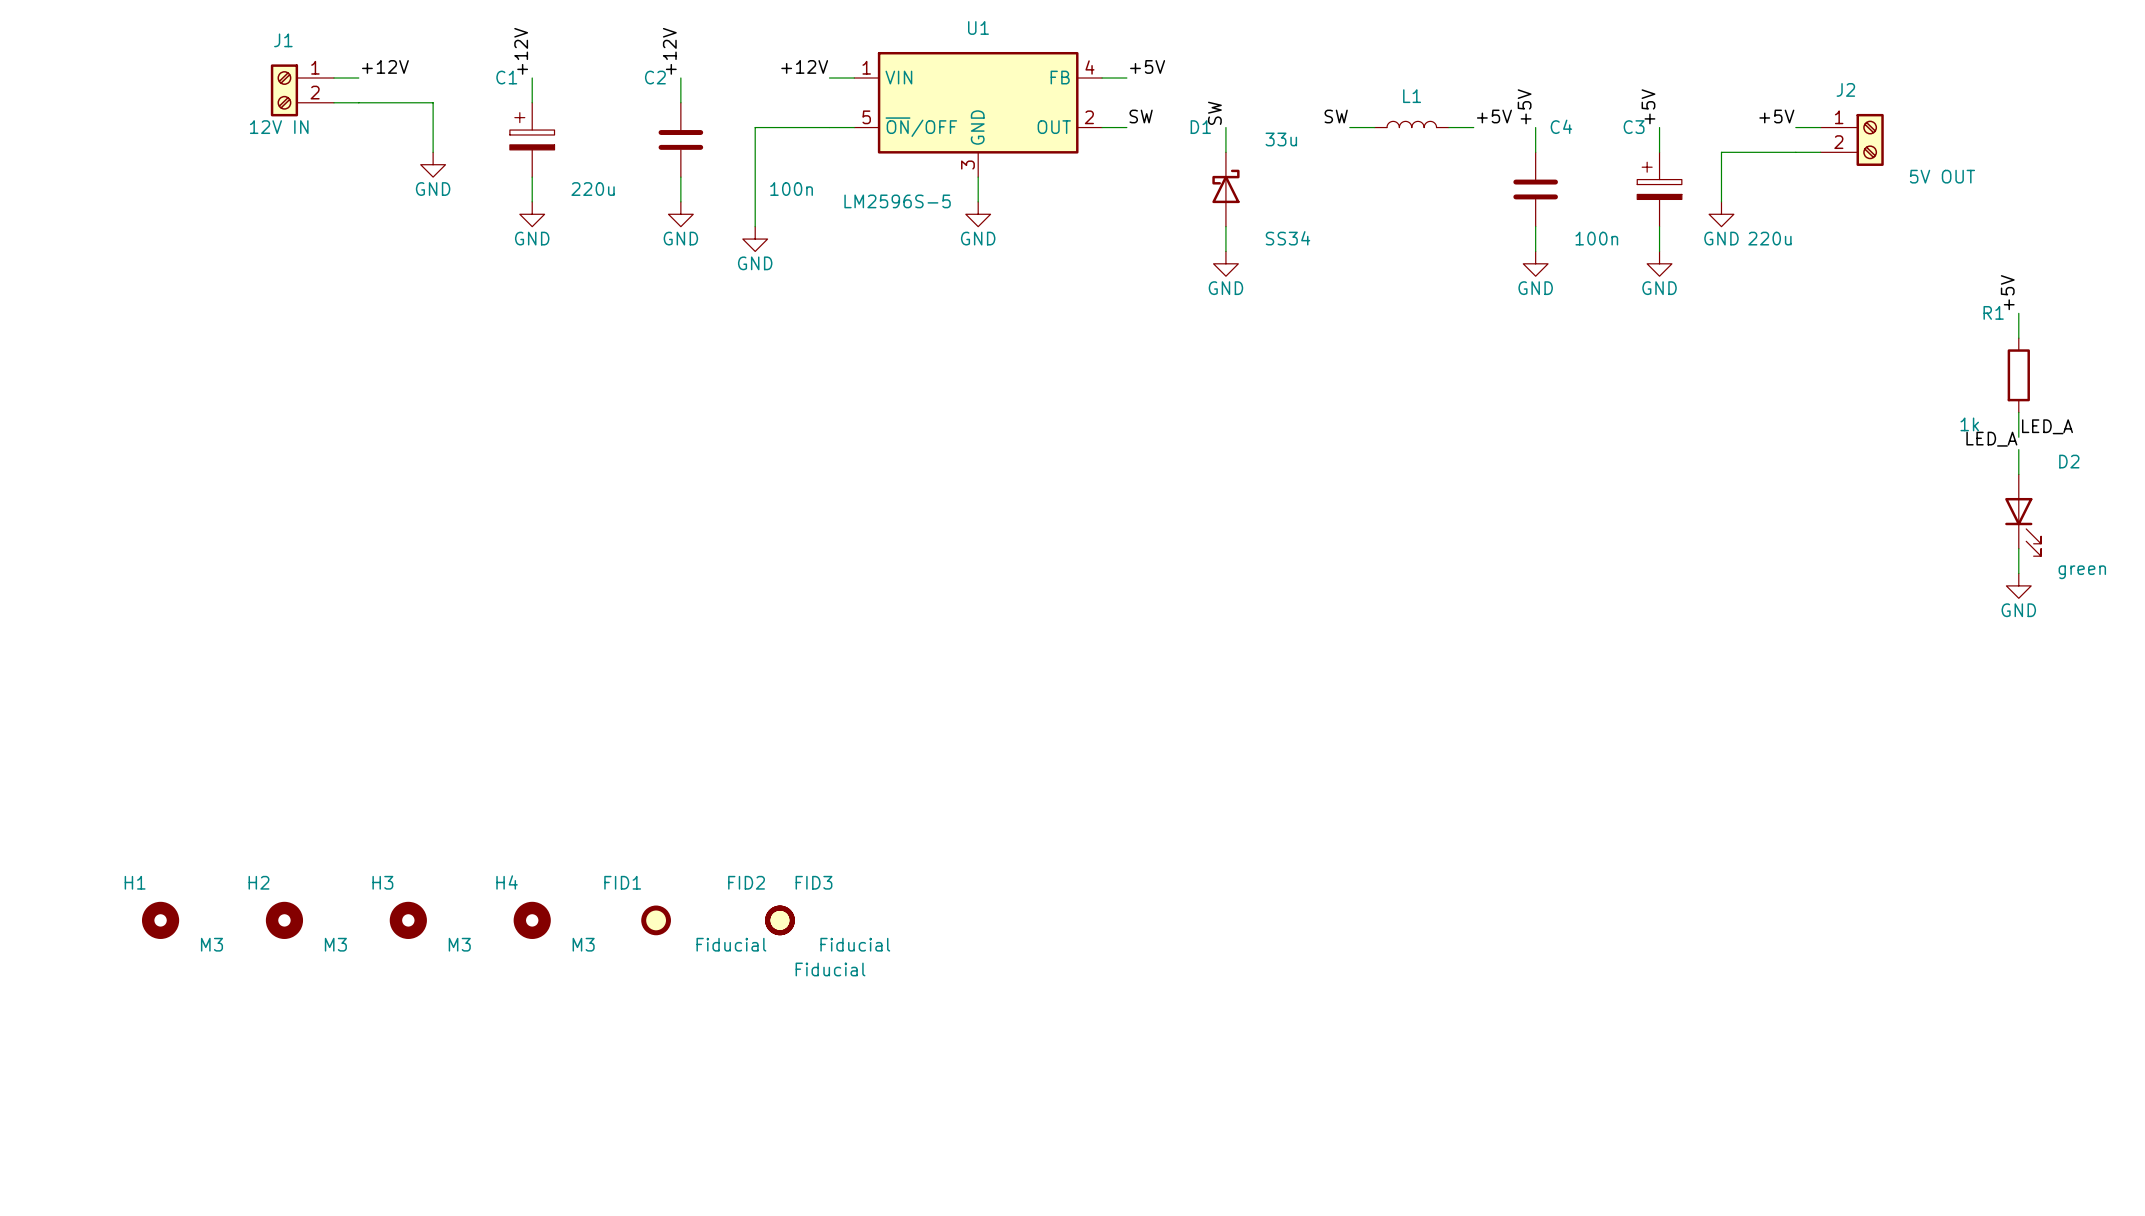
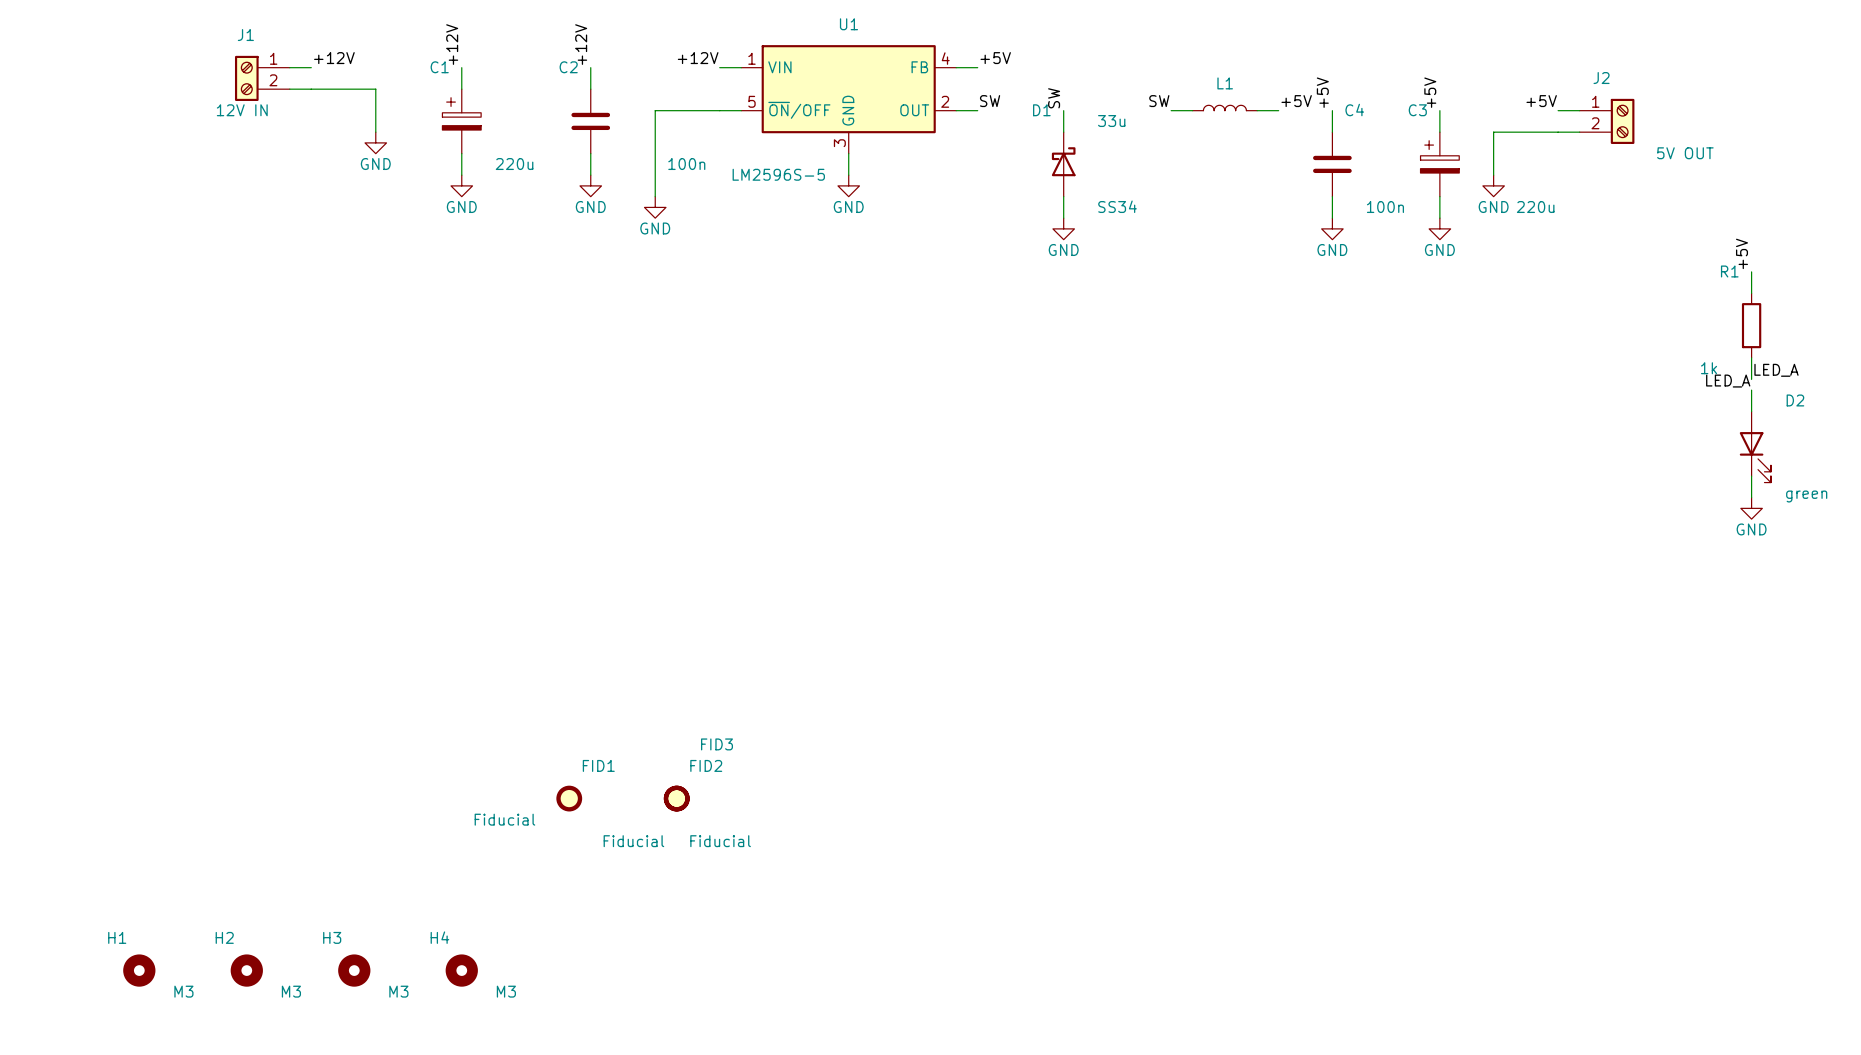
FID1 name position: FID1 (622, 882) -> FID1 (598, 765)
FID2 name position: FID2 (746, 882) -> FID2 (706, 765)
FID3 name position: FID3 (813, 882) -> FID3 (717, 744)
H1 position: (160, 920) -> (139, 970)
H2 position: (284, 920) -> (246, 970)
H3 position: (408, 920) -> (354, 970)
H4 position: (532, 920) -> (461, 970)
FID1 value position: Fiducial (731, 944) -> Fiducial (504, 819)
FID2 value position: Fiducial (855, 944) -> Fiducial (720, 841)
FID3 value position: Fiducial (830, 969) -> Fiducial (633, 841)

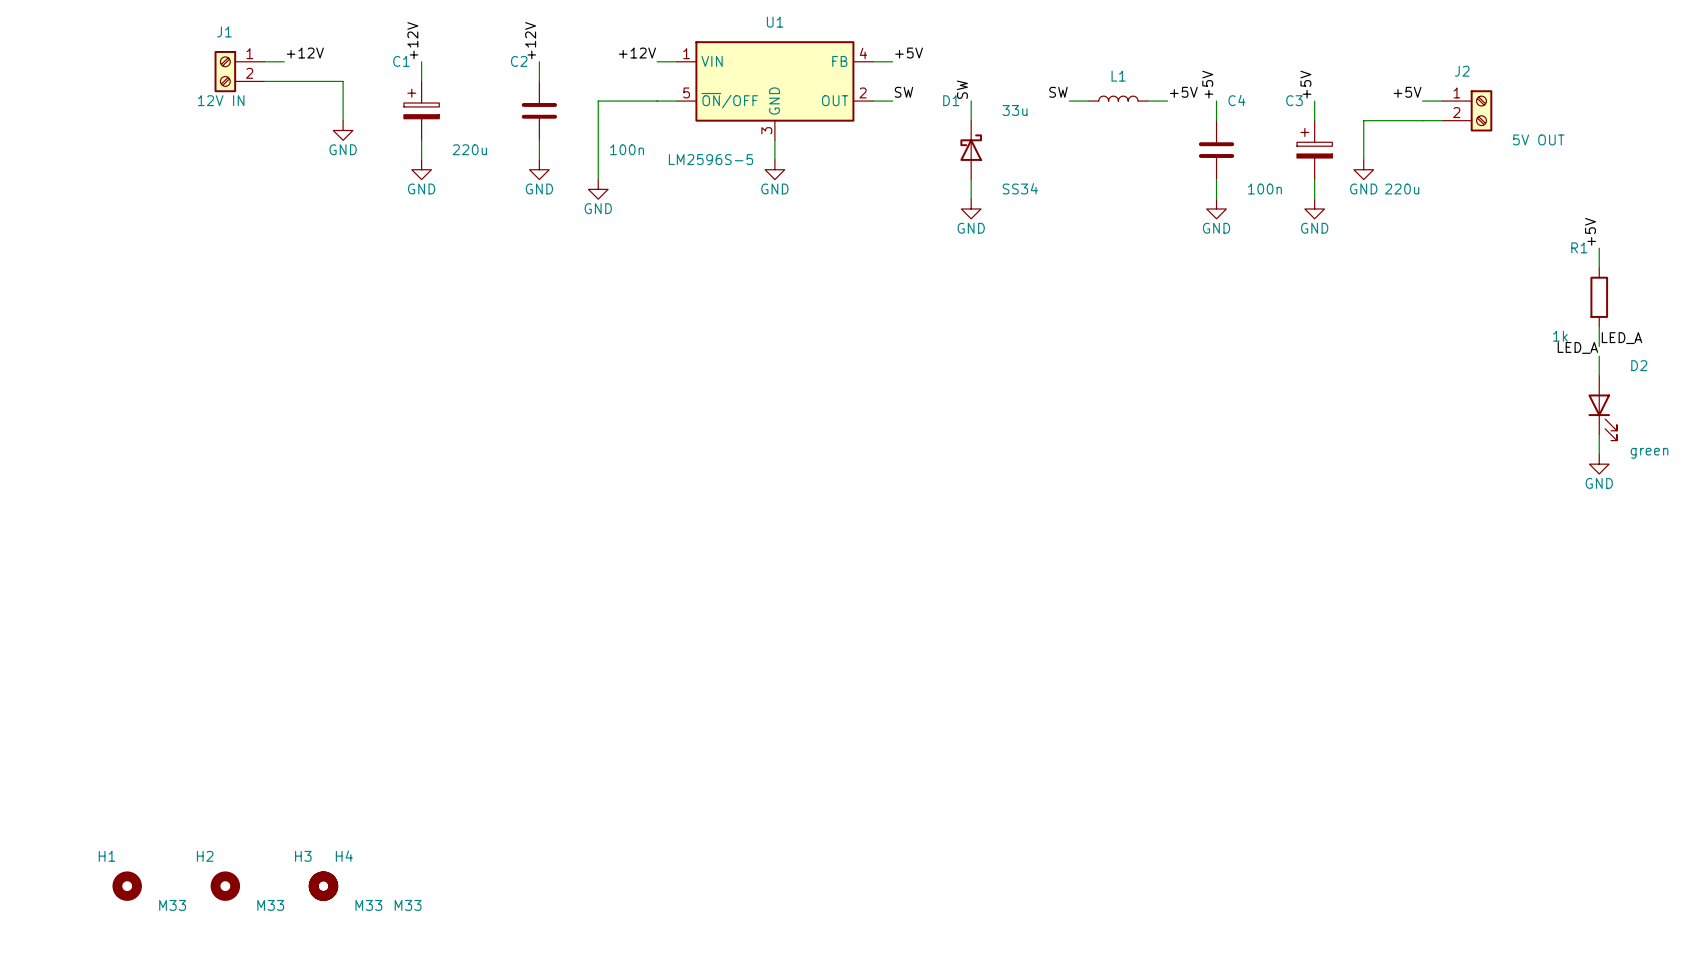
FID1: Fiducial (569, 798) -> none
FID2: Fiducial (676, 798) -> none
FID3: Fiducial (676, 798) -> none
H4 name position: H4 (439, 937) -> H4 (344, 856)
H4 position: (461, 970) -> (323, 886)
H1 value: M3 (183, 991) -> M33 (172, 905)
H2 value: M3 (291, 991) -> M33 (270, 905)
H3 value: M3 (398, 991) -> M33 (368, 905)
H4 value: M3 (506, 991) -> M33 (408, 905)

